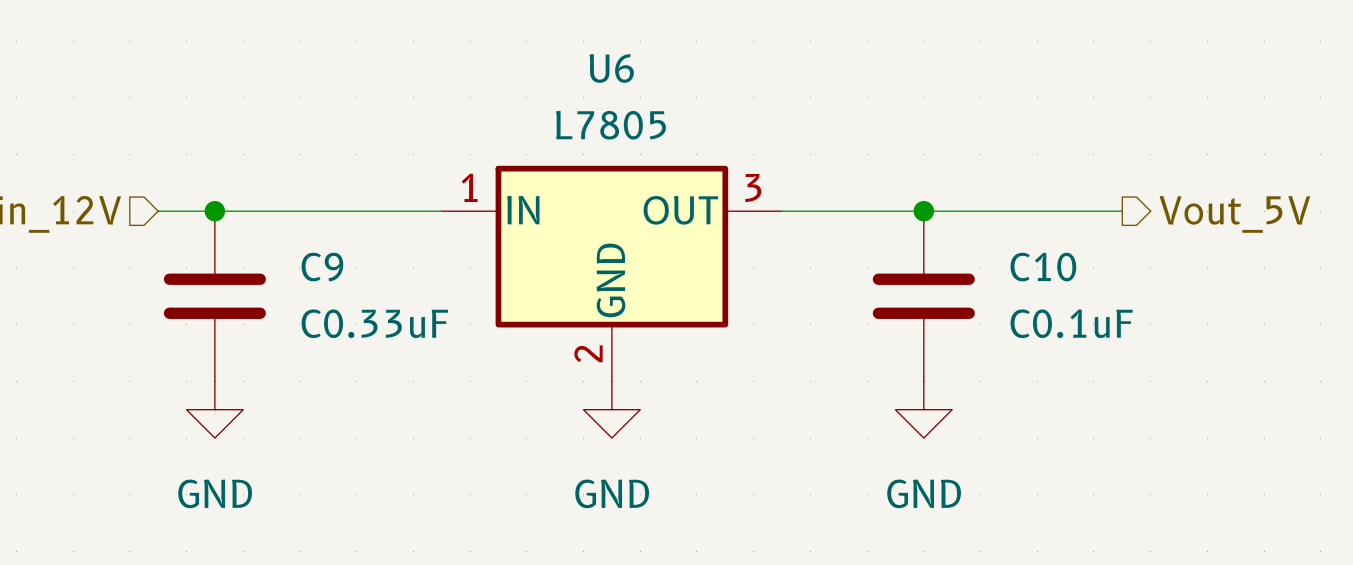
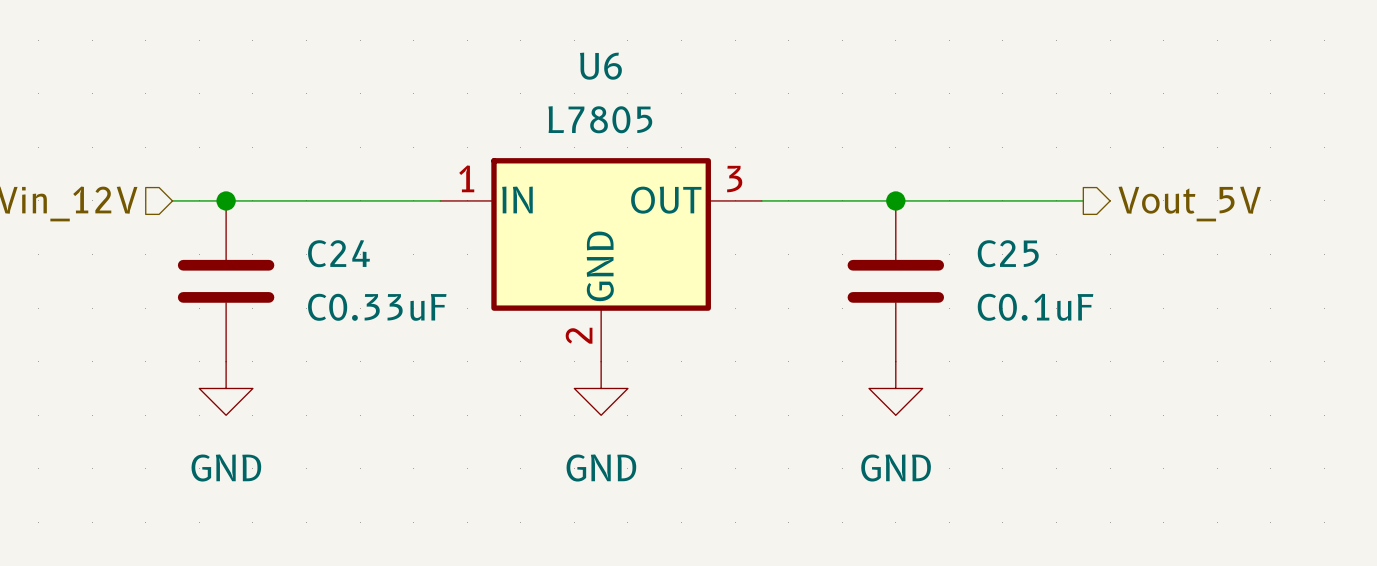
C9 name: C9 (322, 267) -> C24 (338, 253)
C10 name: C10 (1043, 267) -> C25 (1008, 253)

